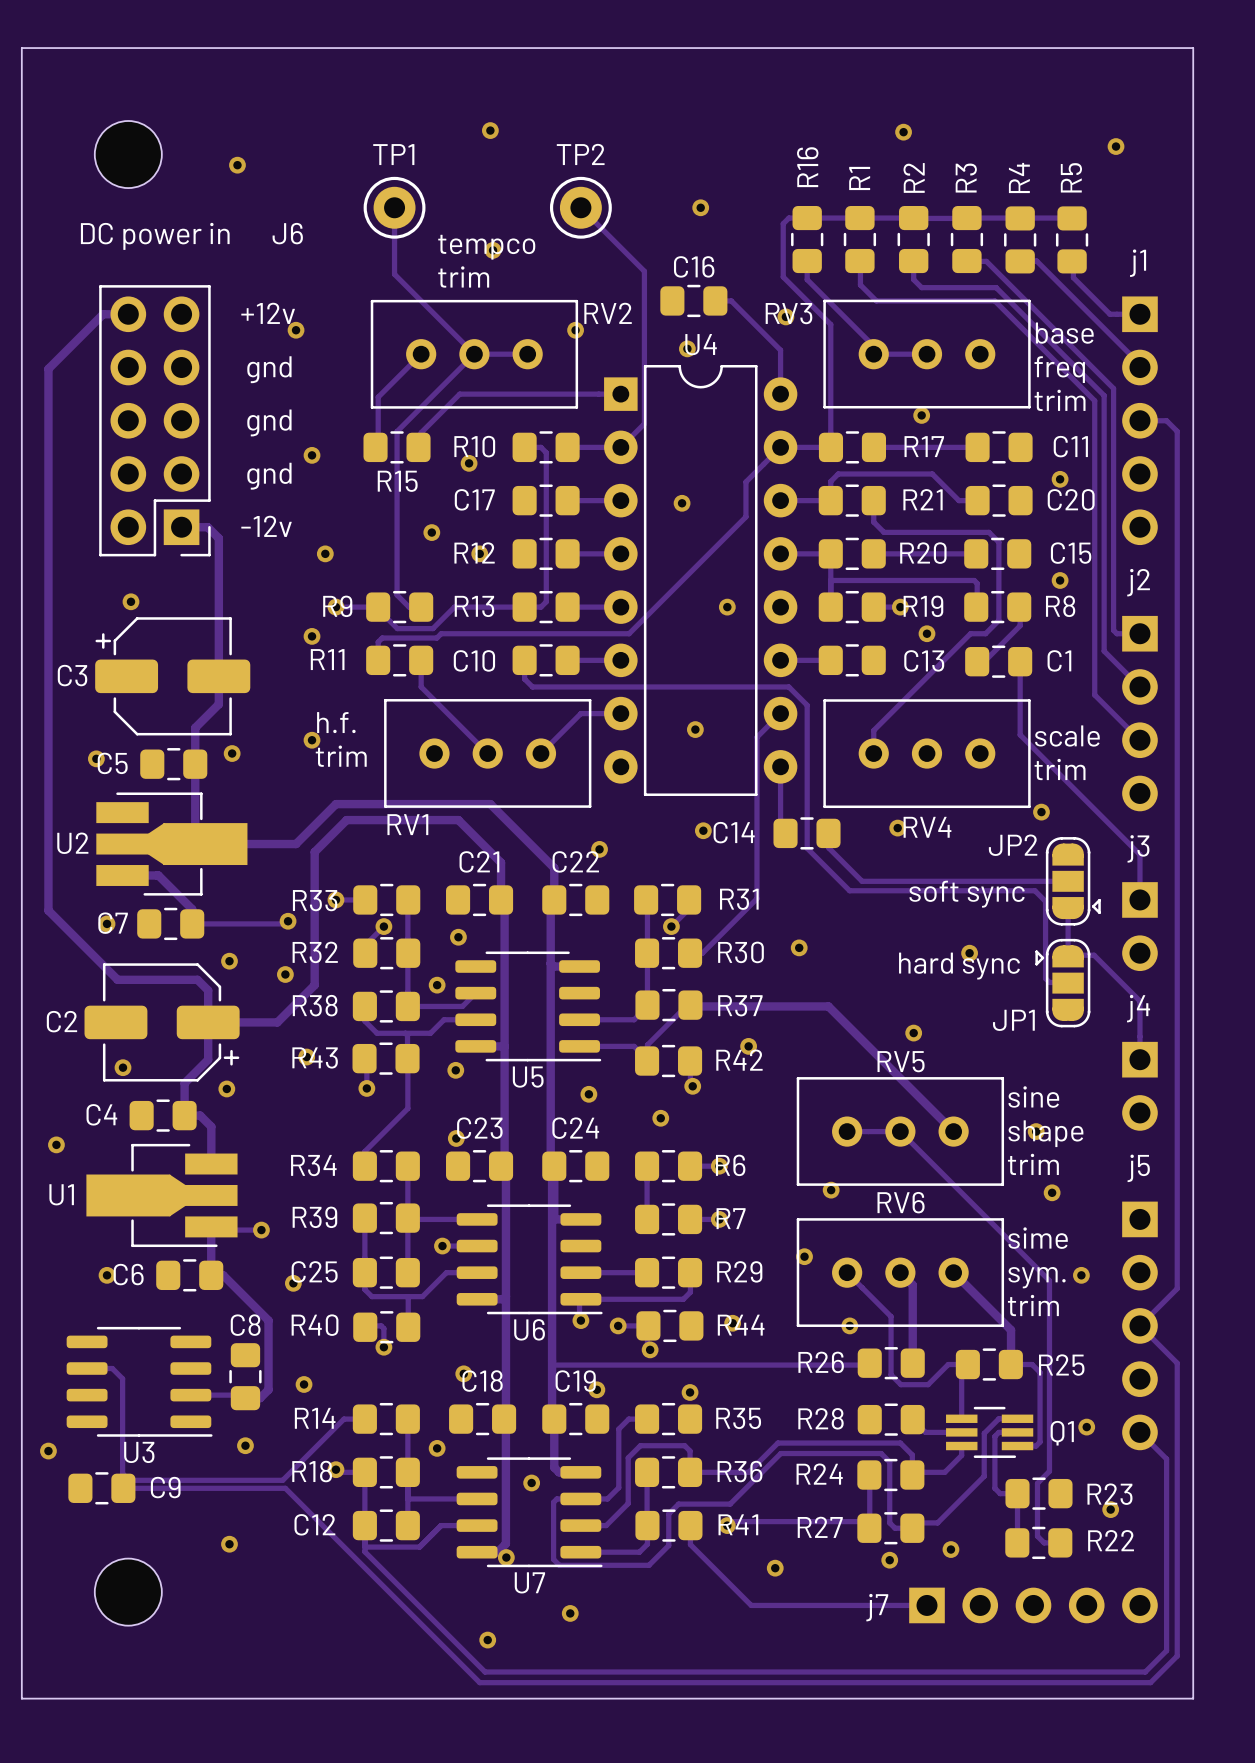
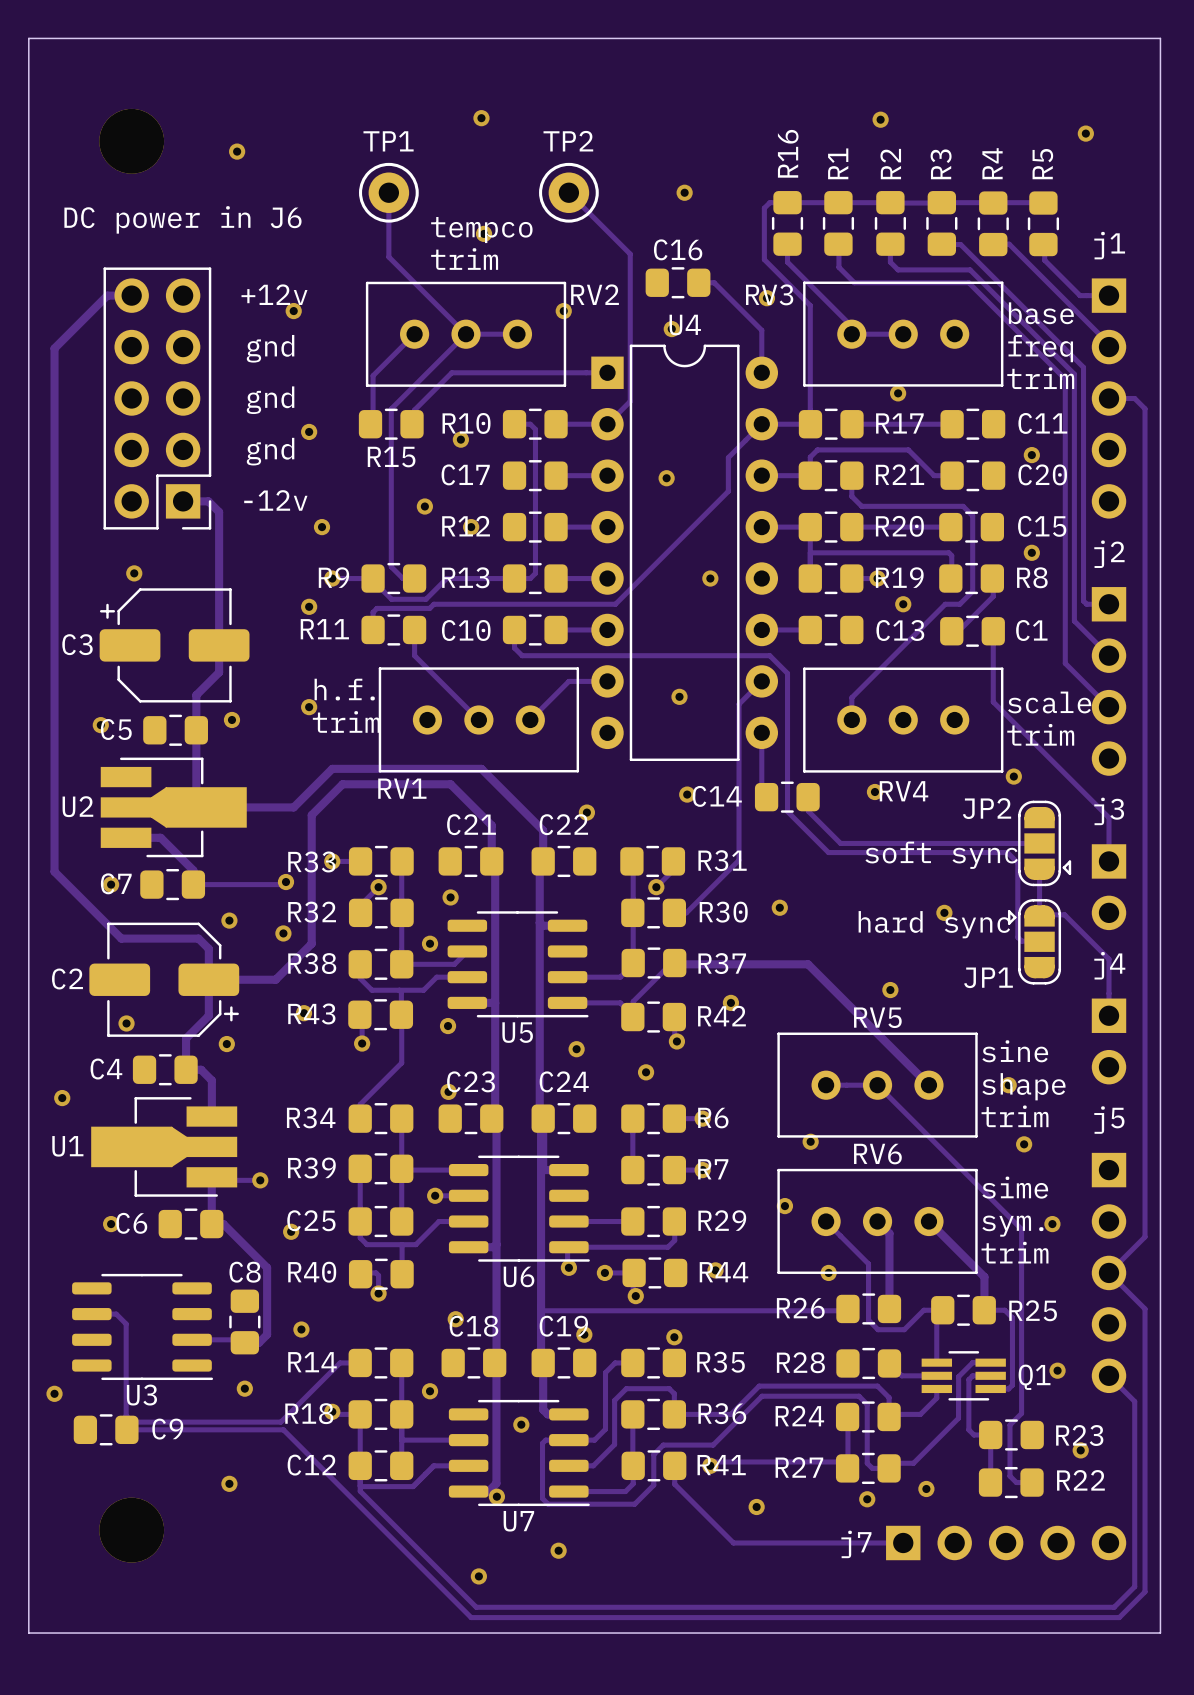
part footprint: [94, 120, 162, 189] -> [99, 108, 165, 174]
part footprint: [94, 1558, 162, 1626] -> [99, 1497, 165, 1563]

